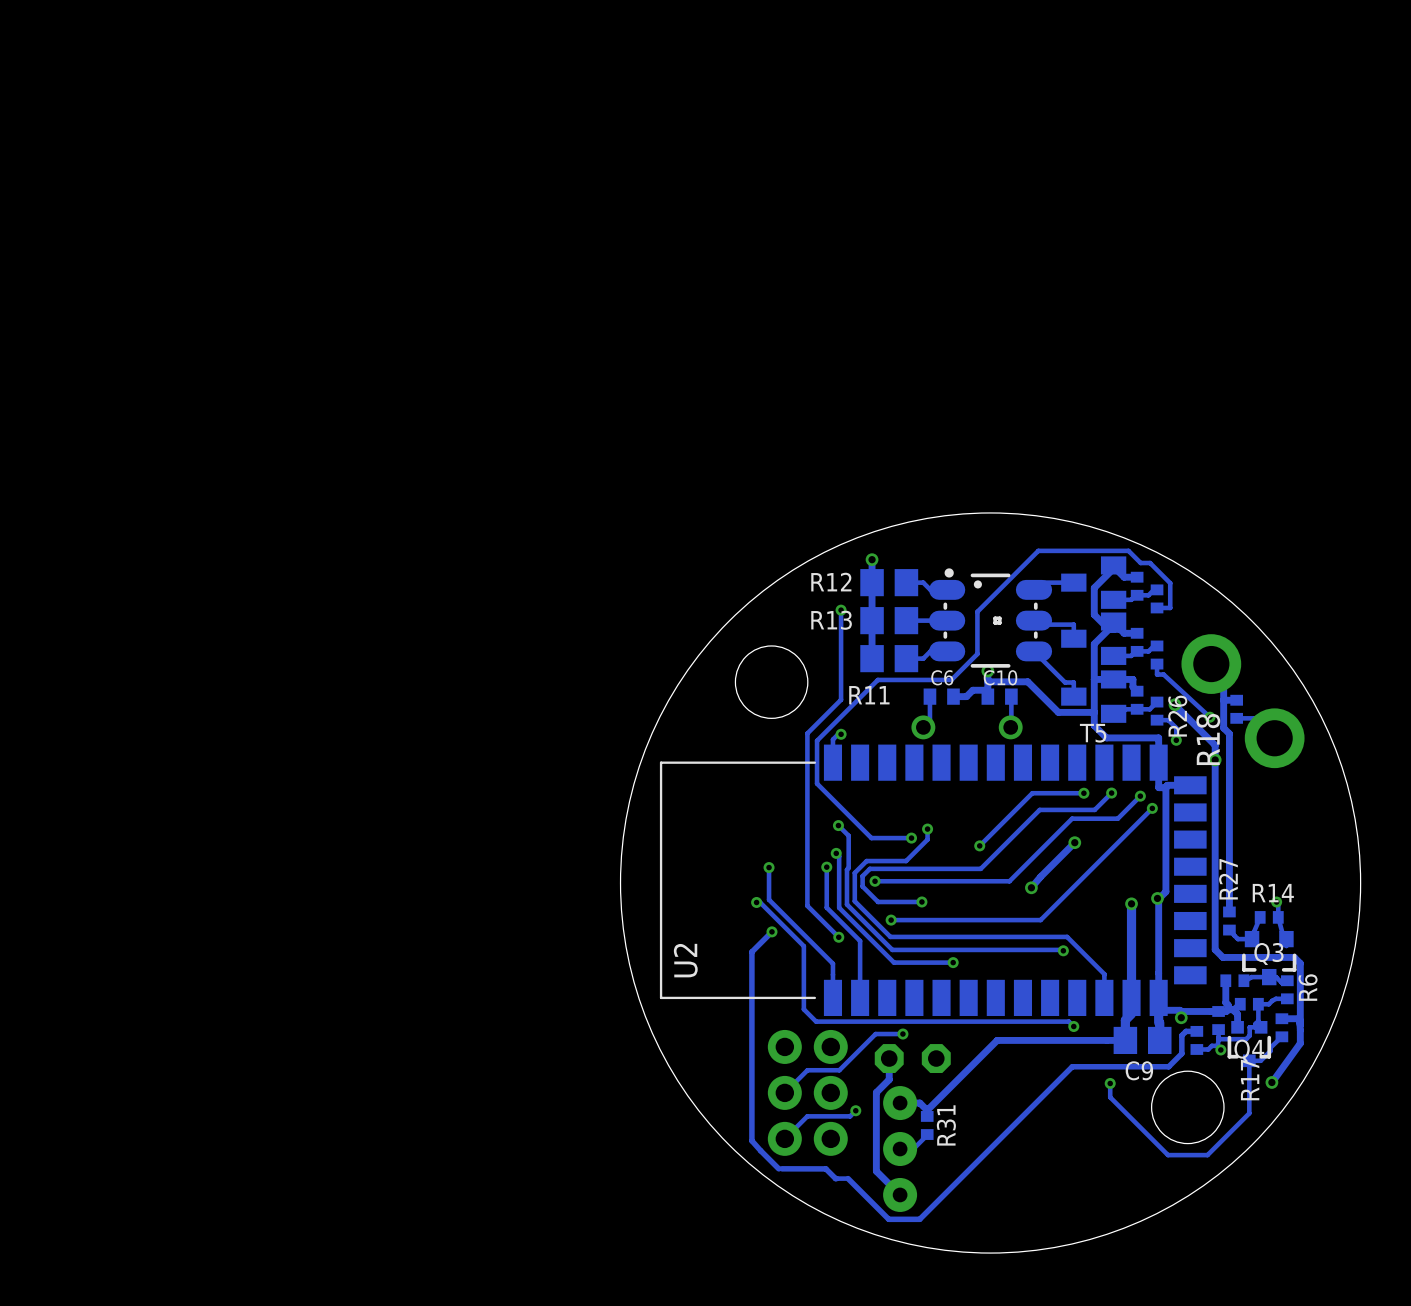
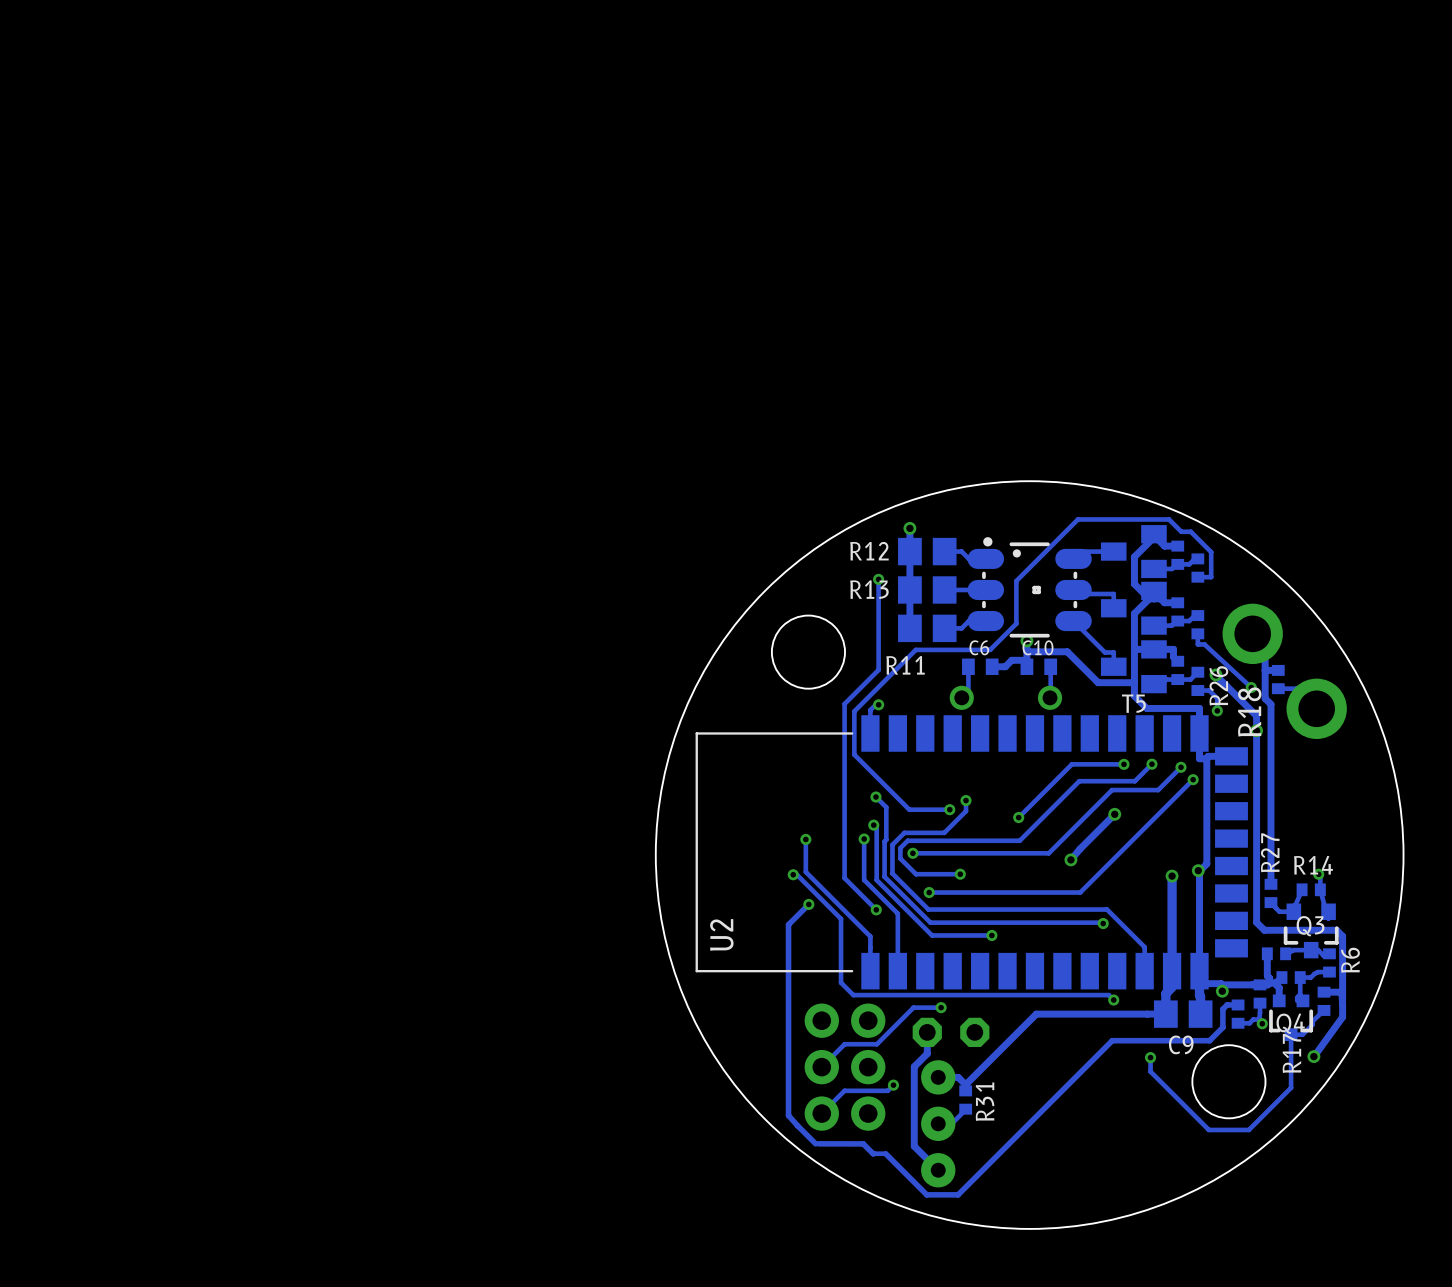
track: (1261, 1027) (1249, 1027) (1249, 1035) (1246, 1039) (1218, 1039) -> none

